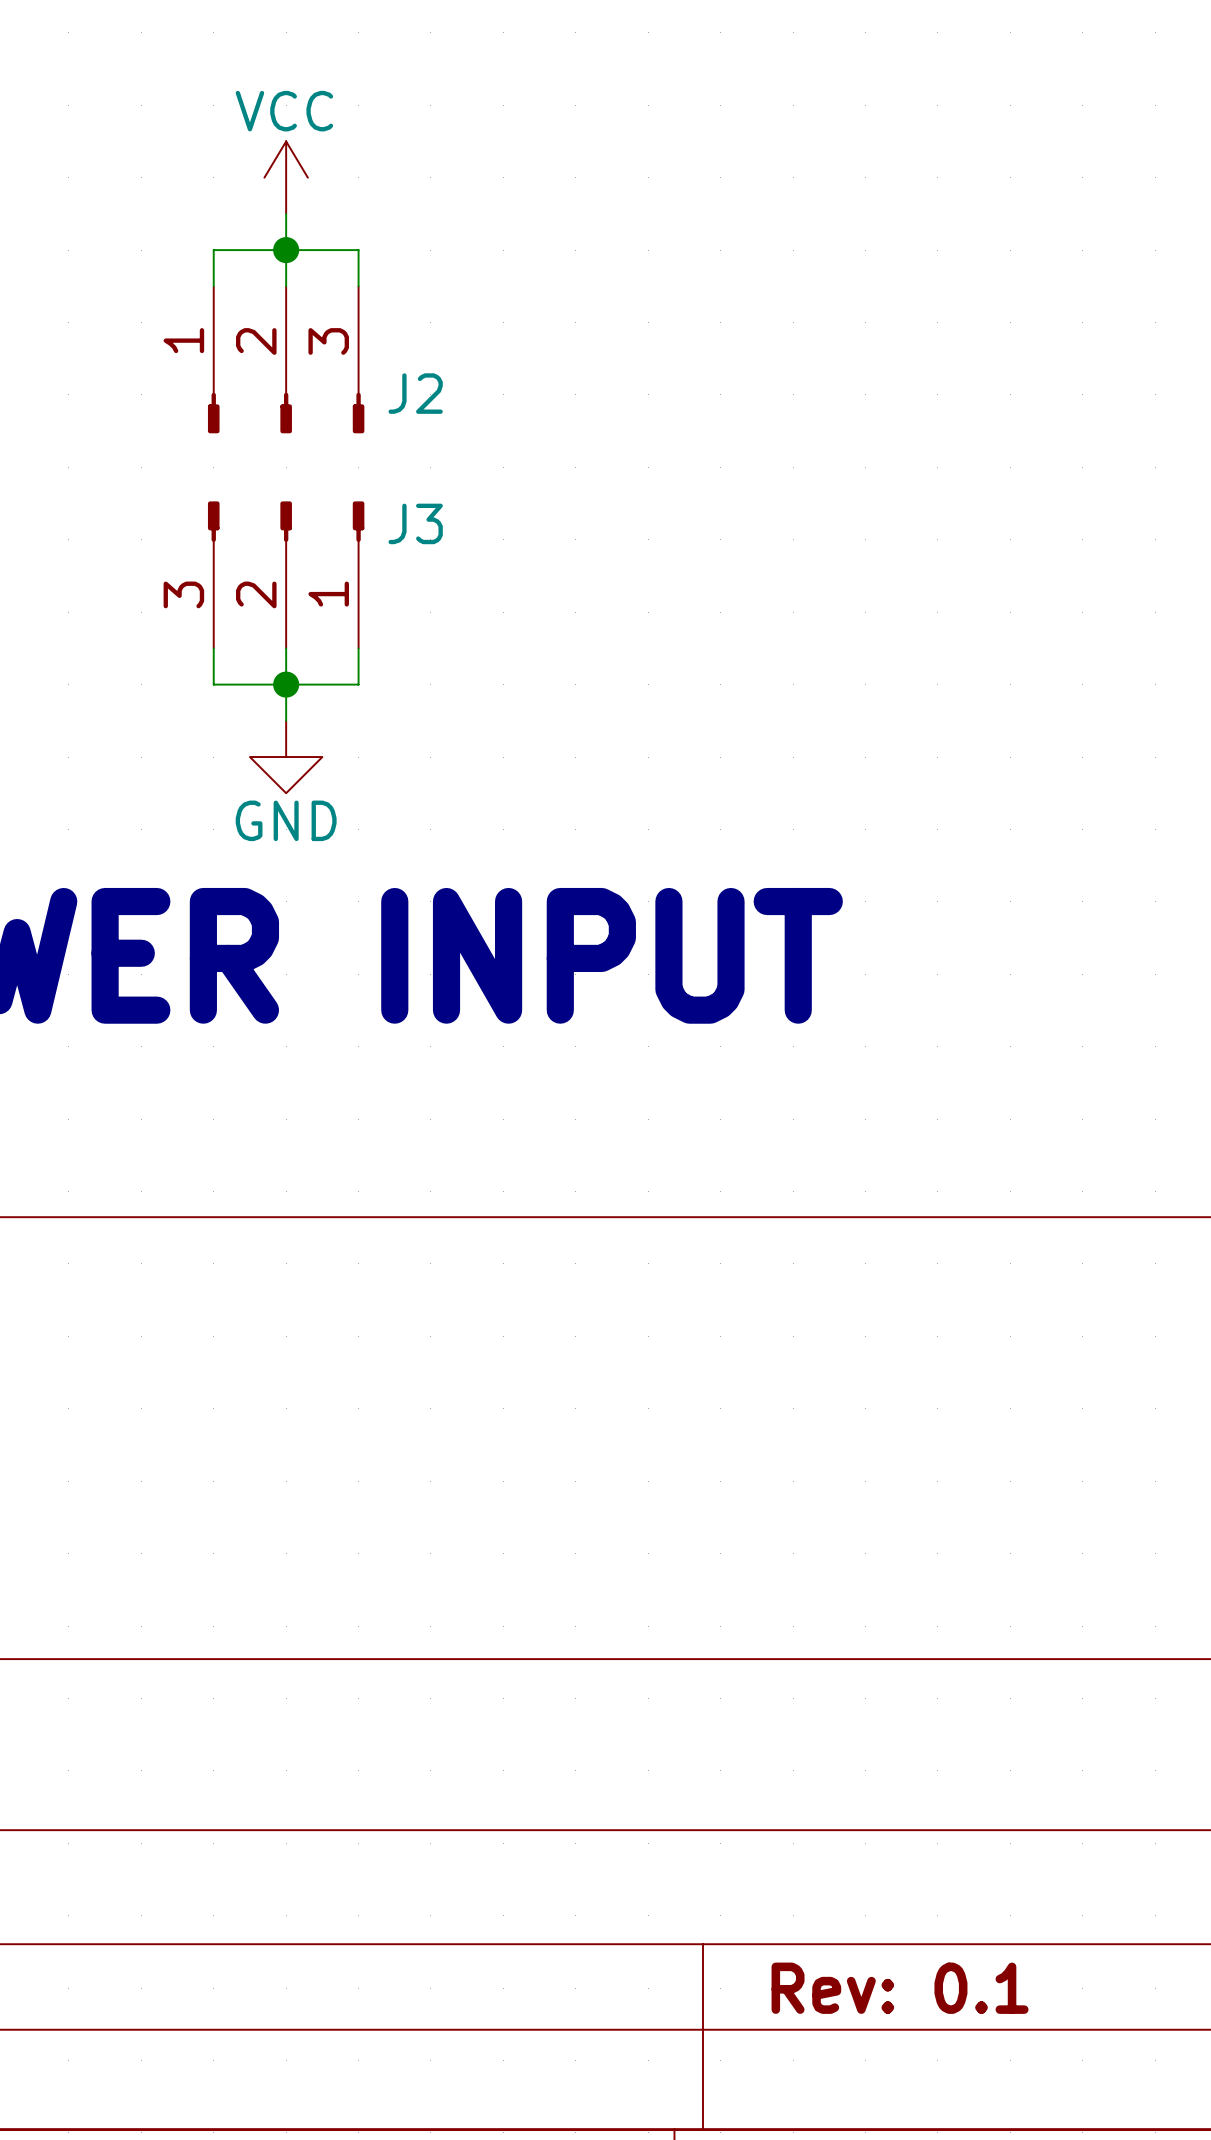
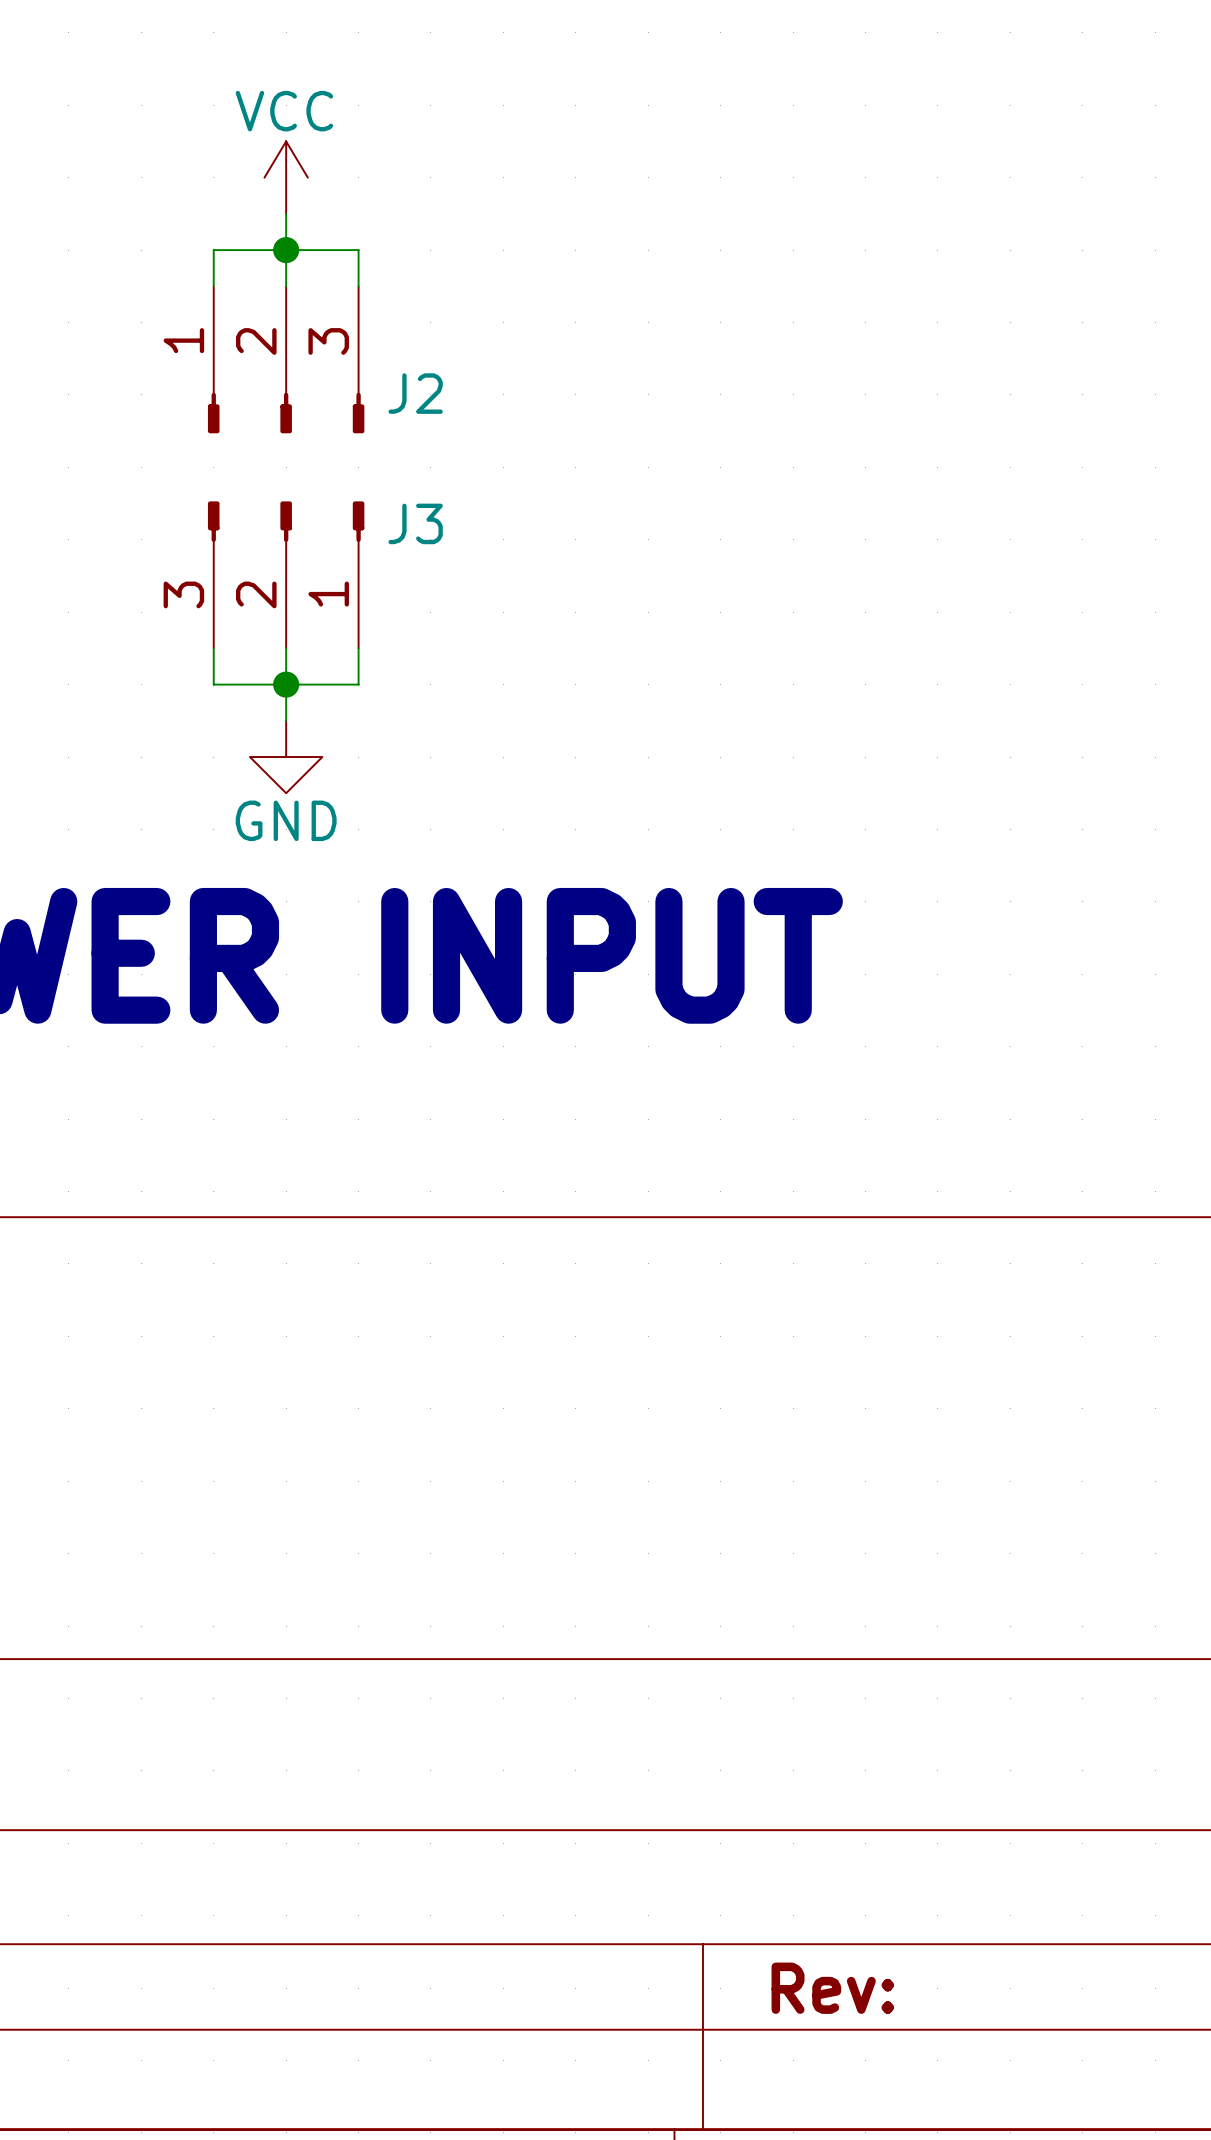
title block: Rev: 0.1 (900, 1988) -> Rev: (832, 1988)

